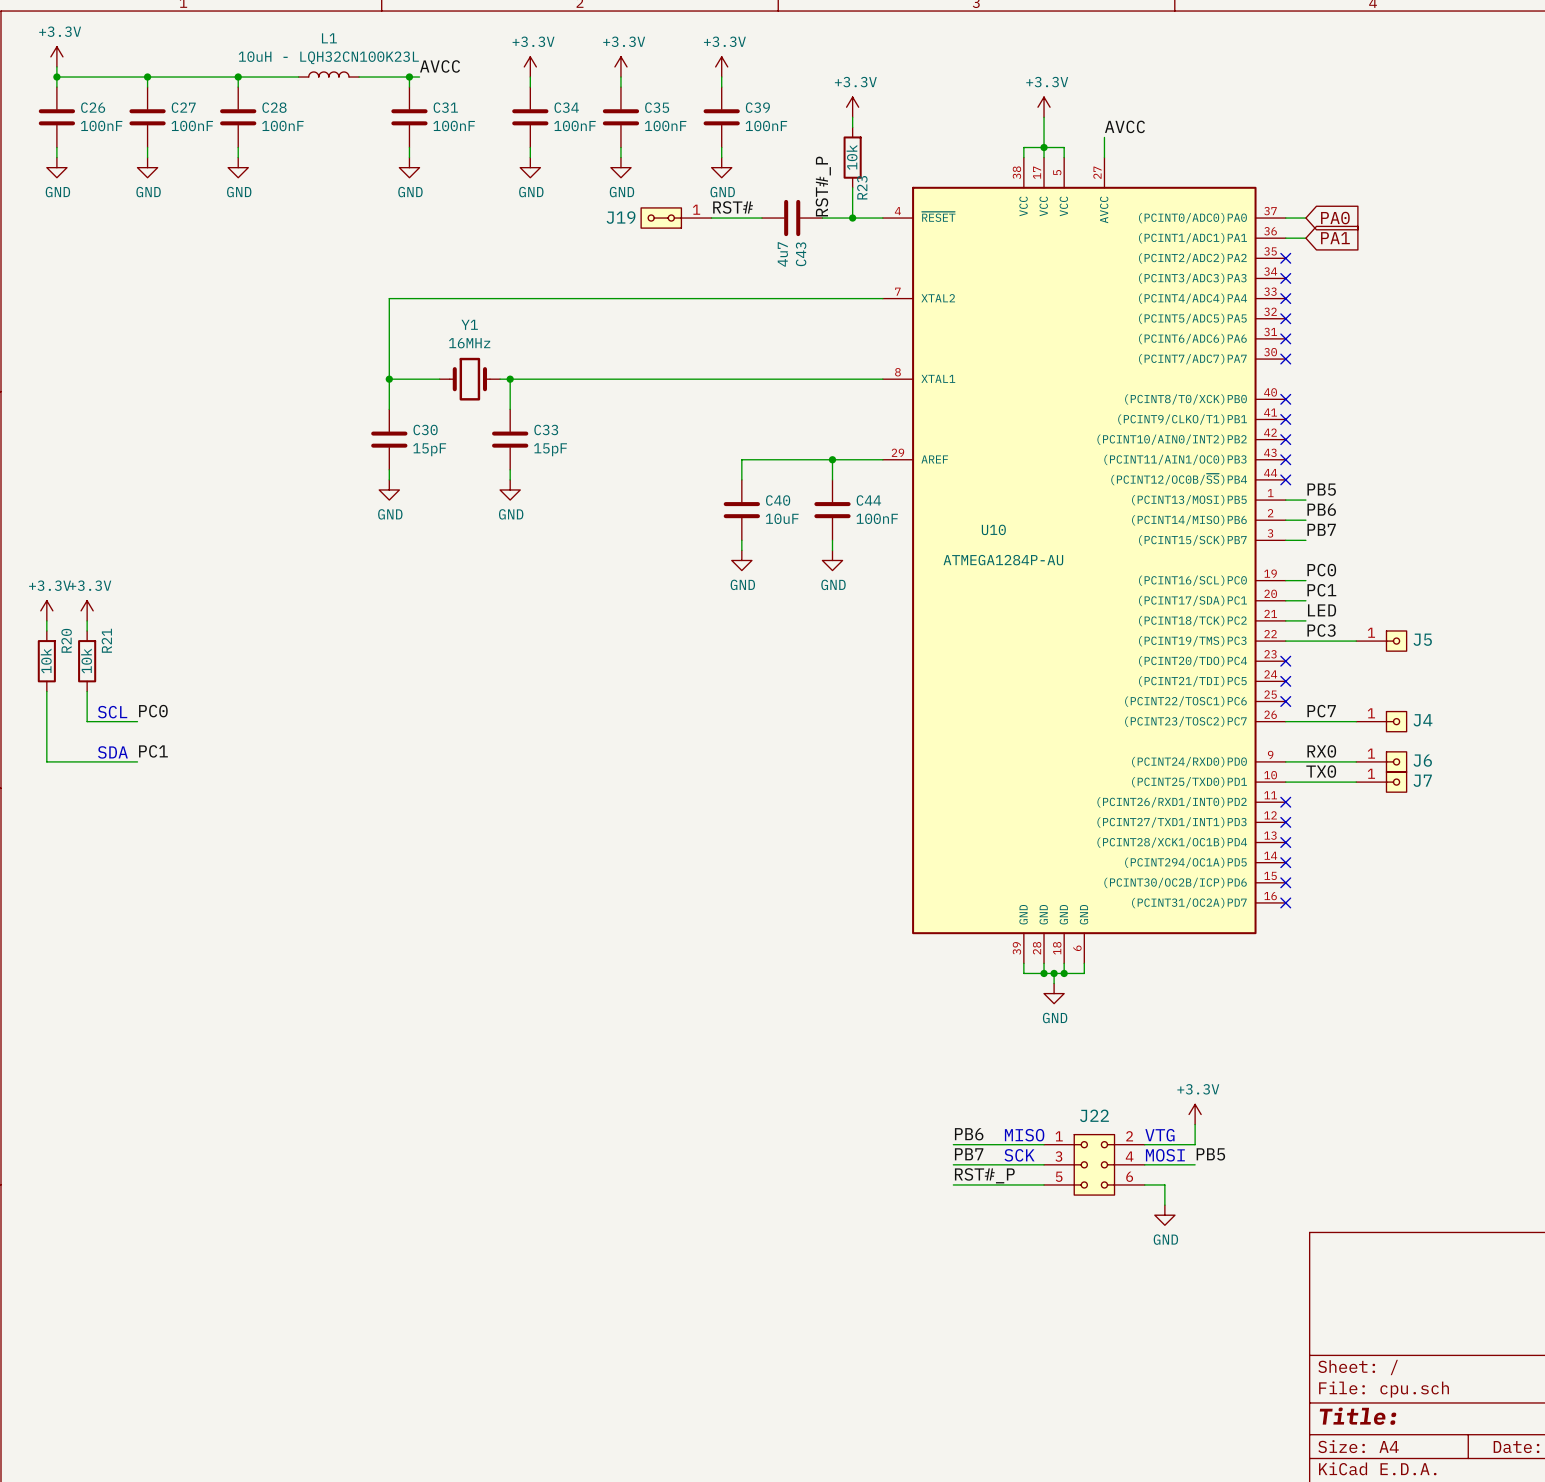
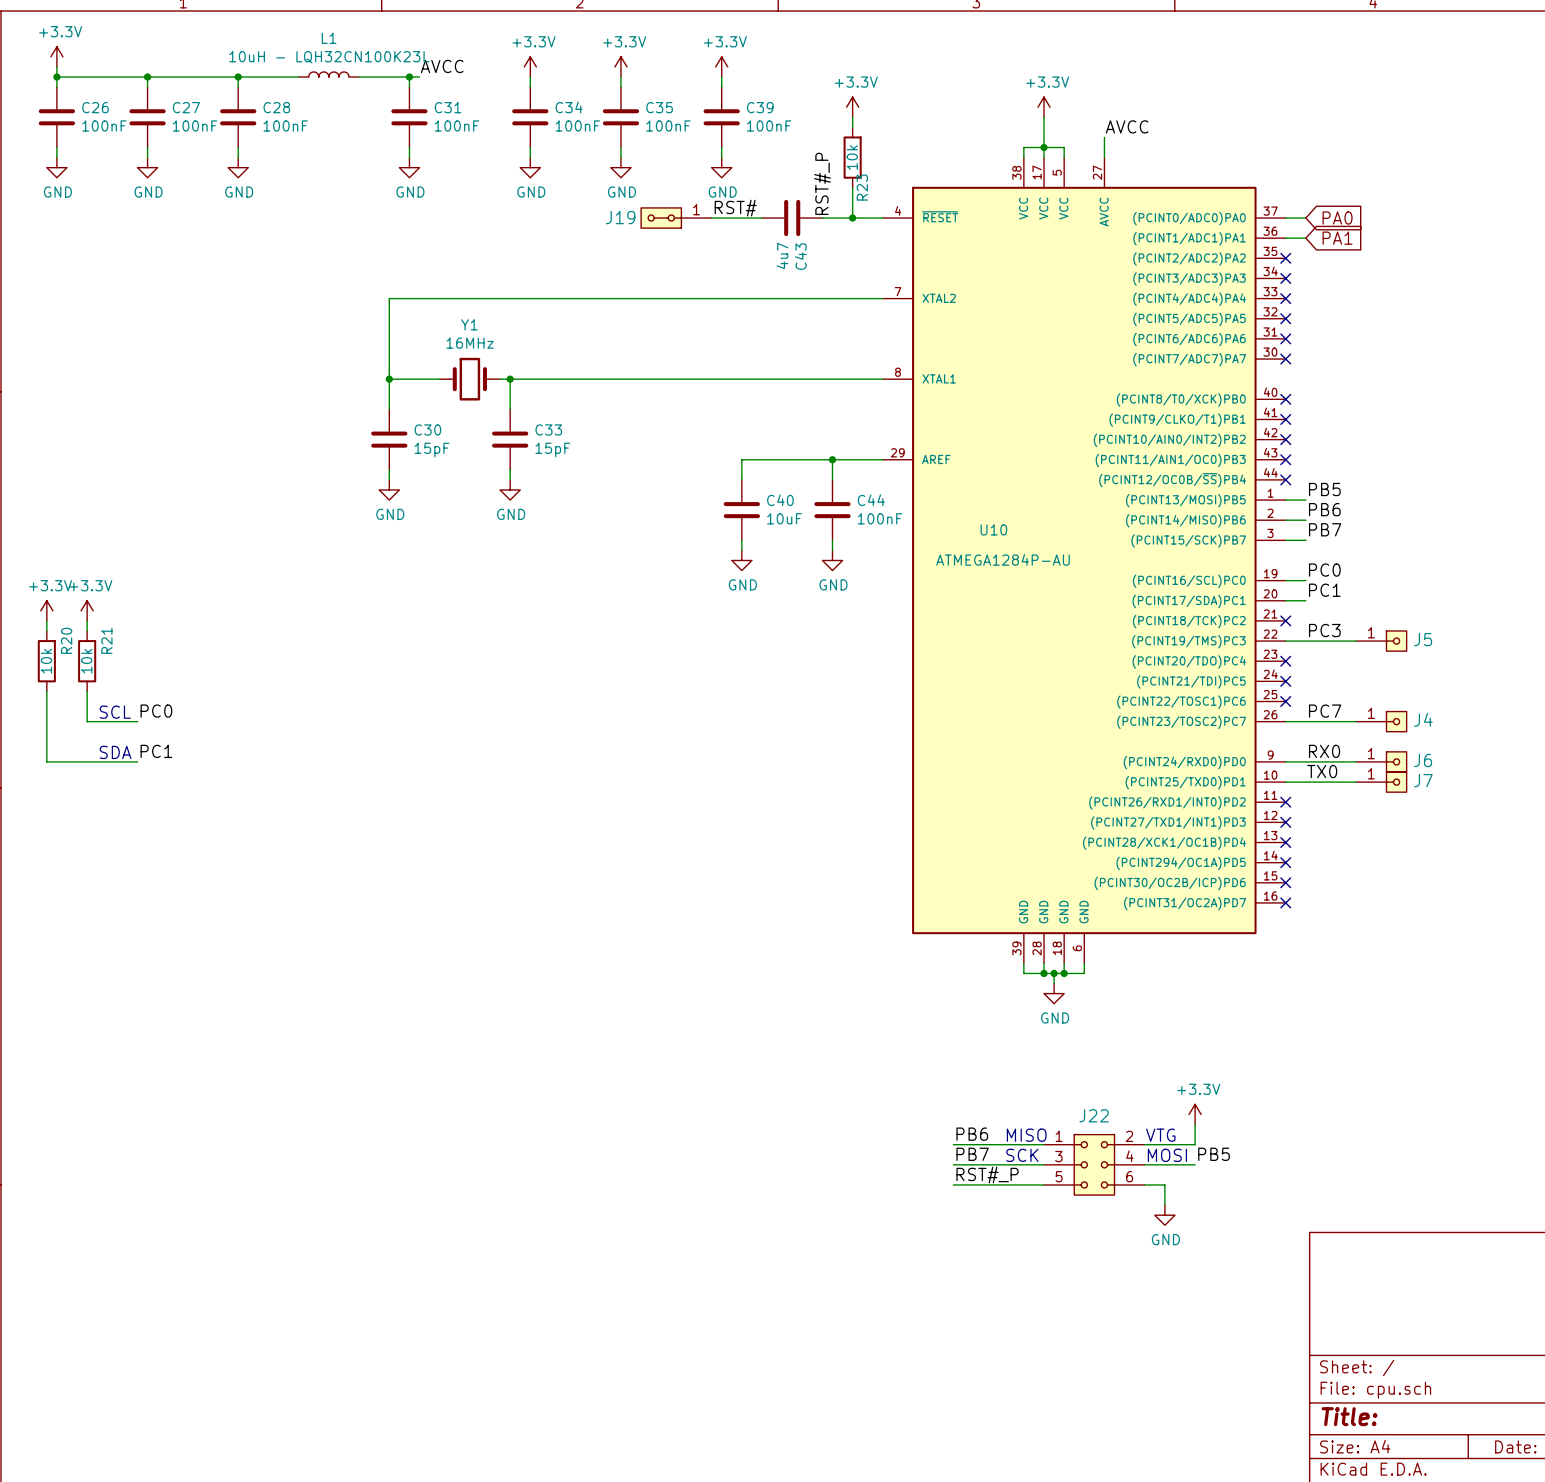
label: LED (1322, 610) -> none
wire: (1285, 620) (1305, 620) -> none
no-connect mark: none -> (1285, 620)

